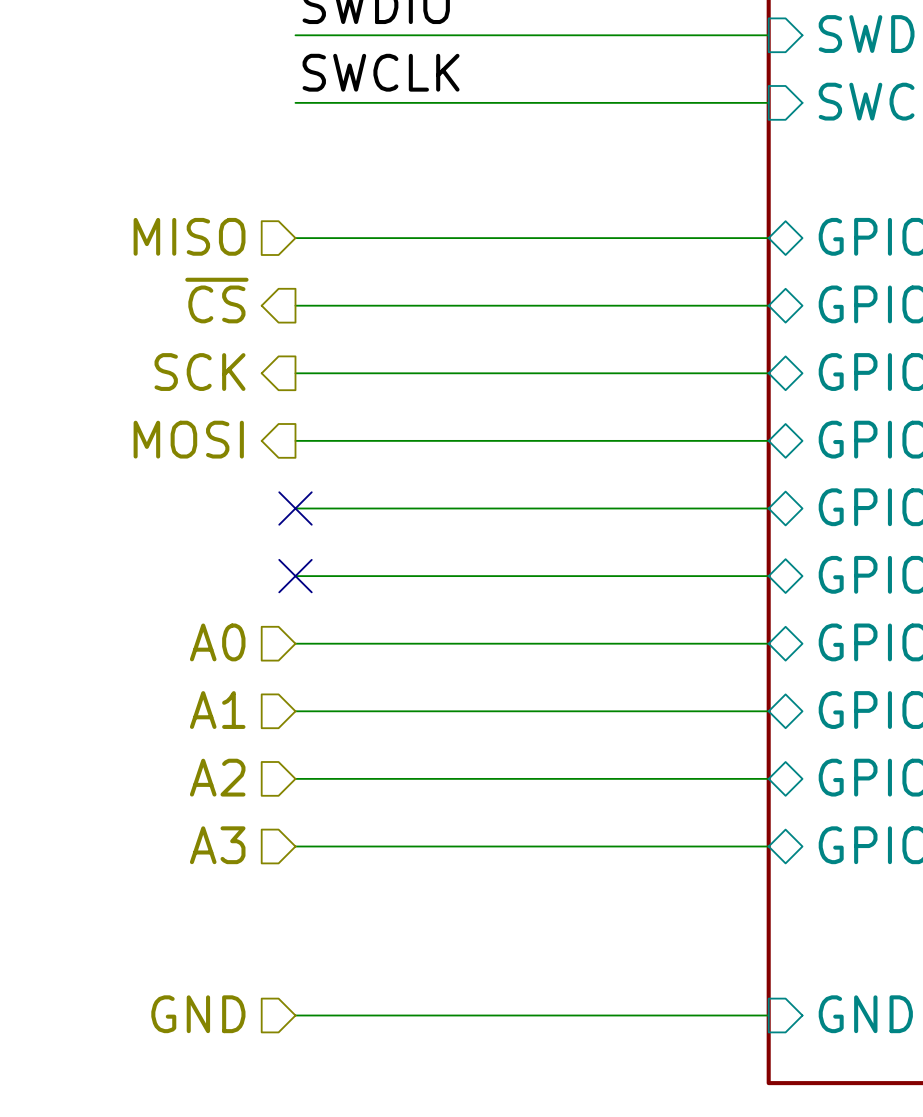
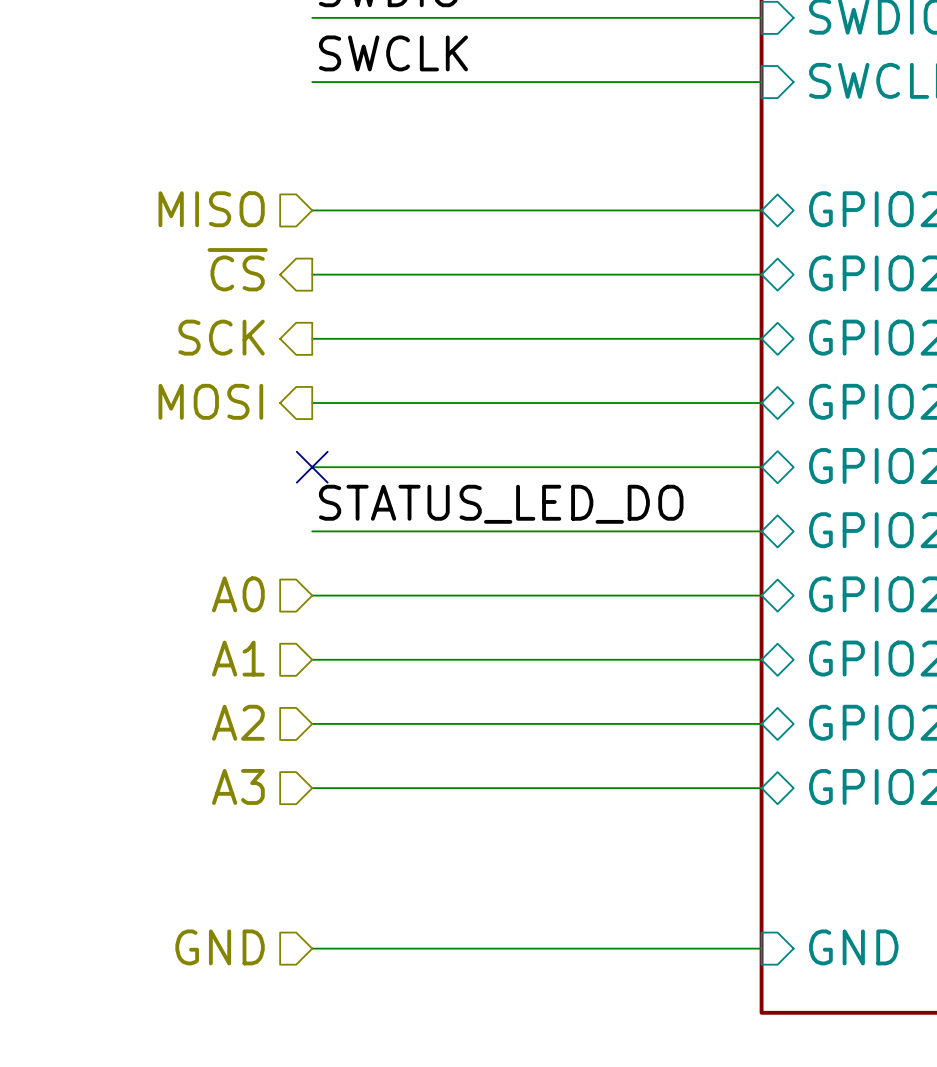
label: none -> STATUS_LED_DO (501, 504)
no-connect mark: (295, 576) -> none

